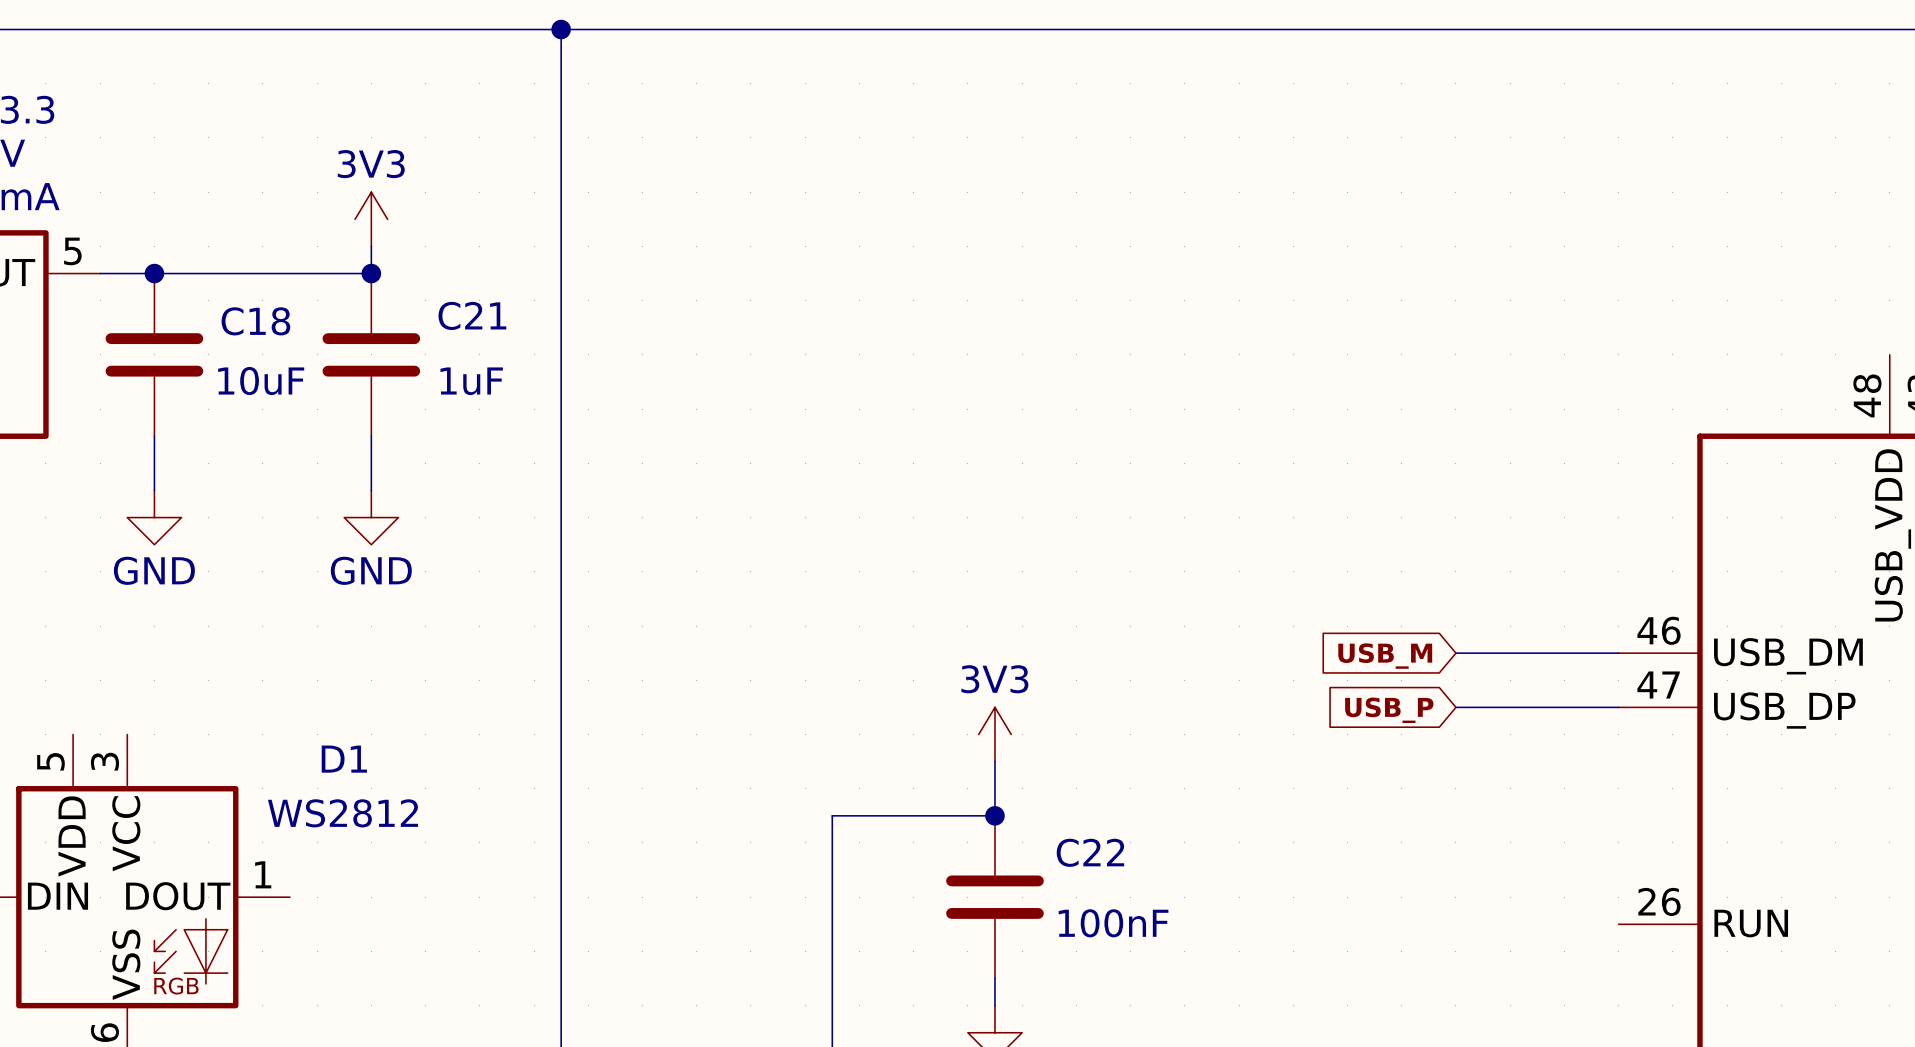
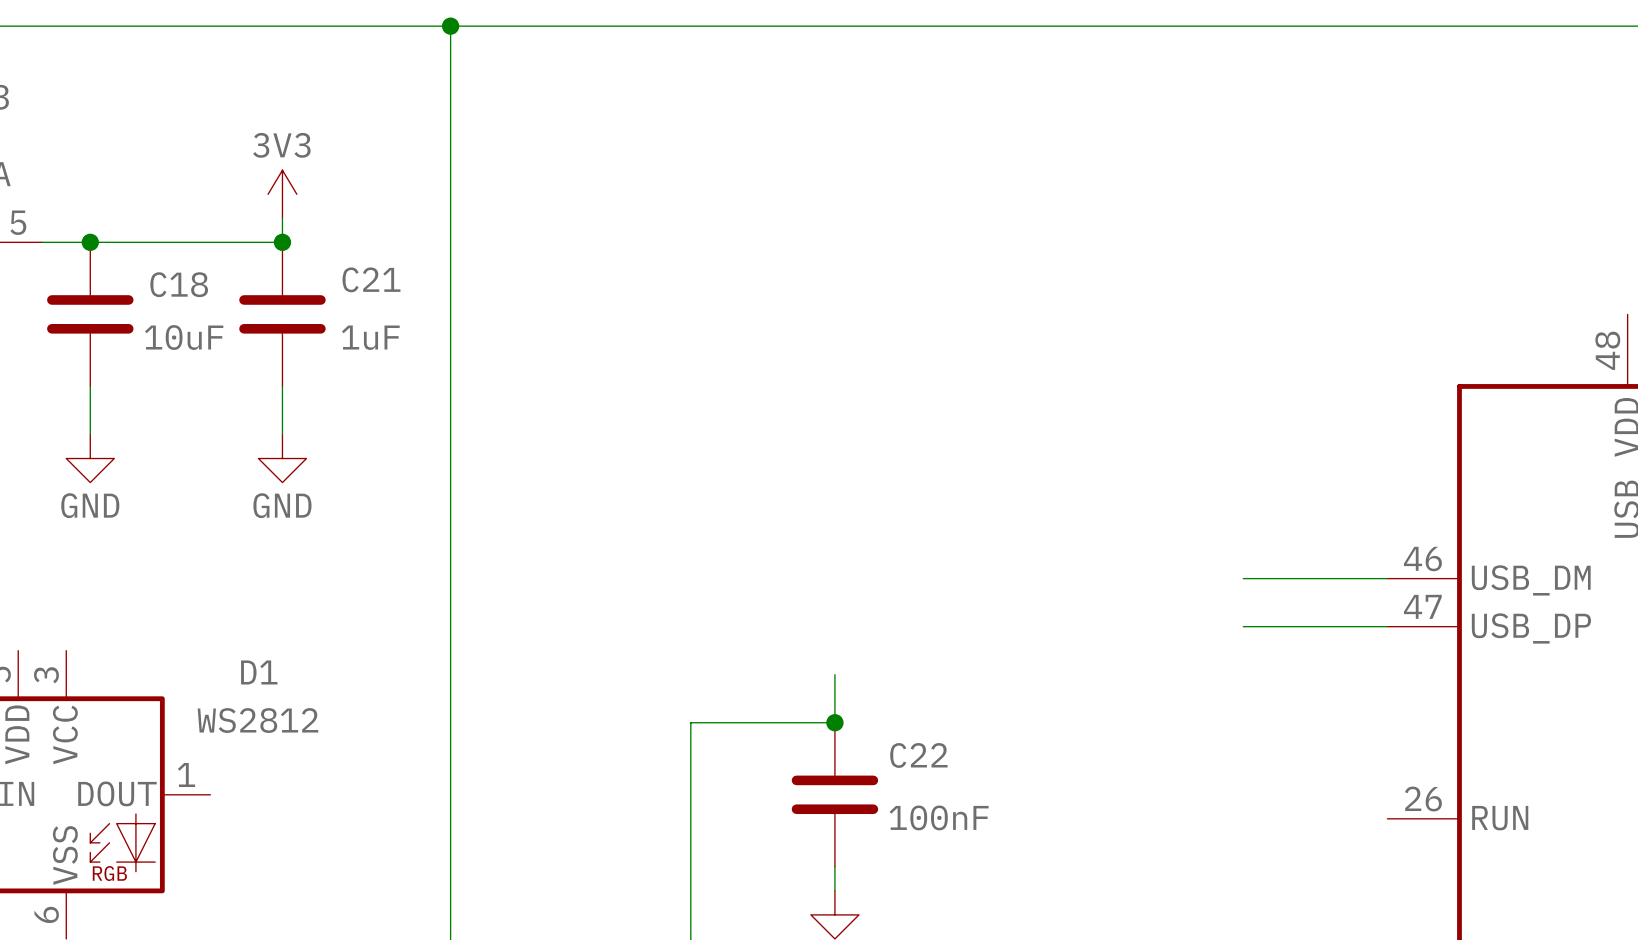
global label: USB_M (1385, 656) -> none
global label: USB_P (1389, 710) -> none
power symbol: 3V3 (994, 734) -> none

